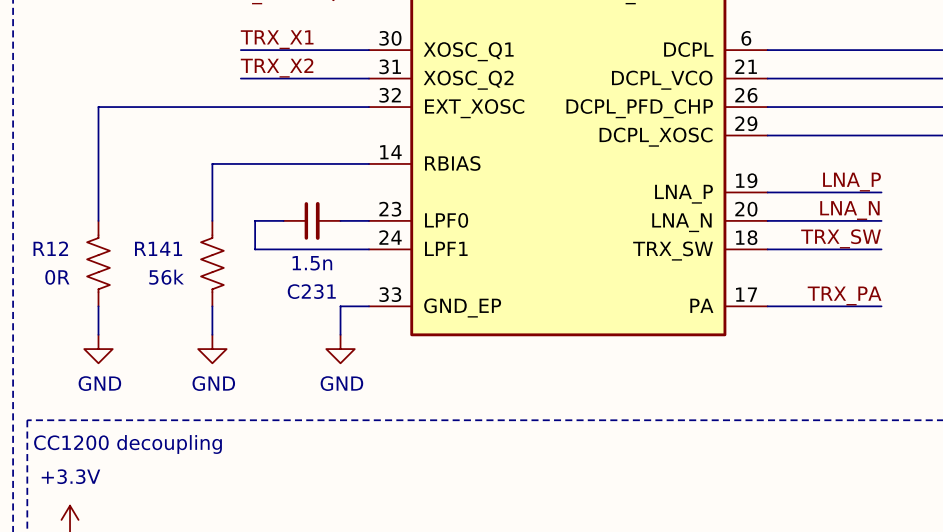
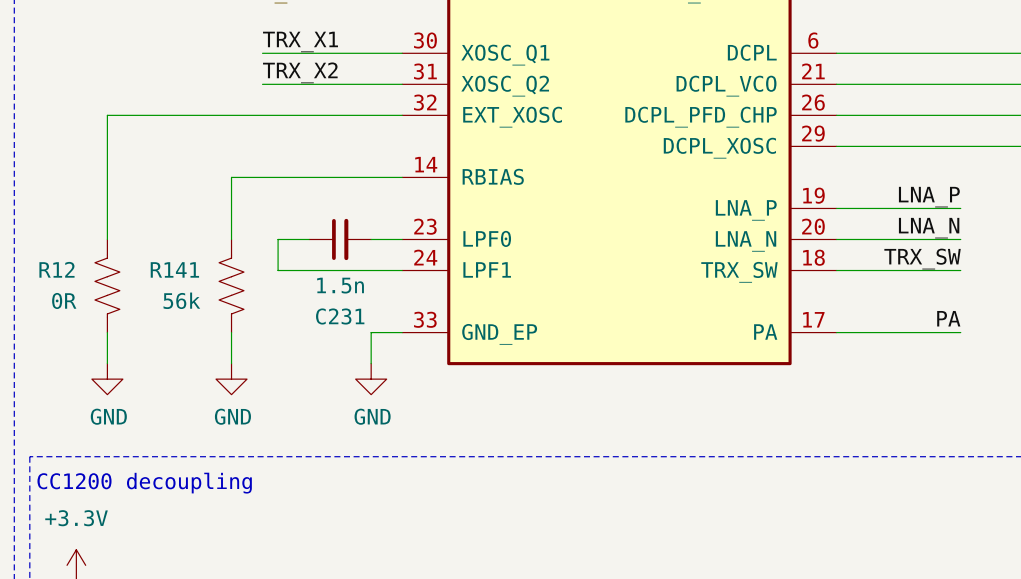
label: TRX_PA (844, 295) -> PA (948, 318)

